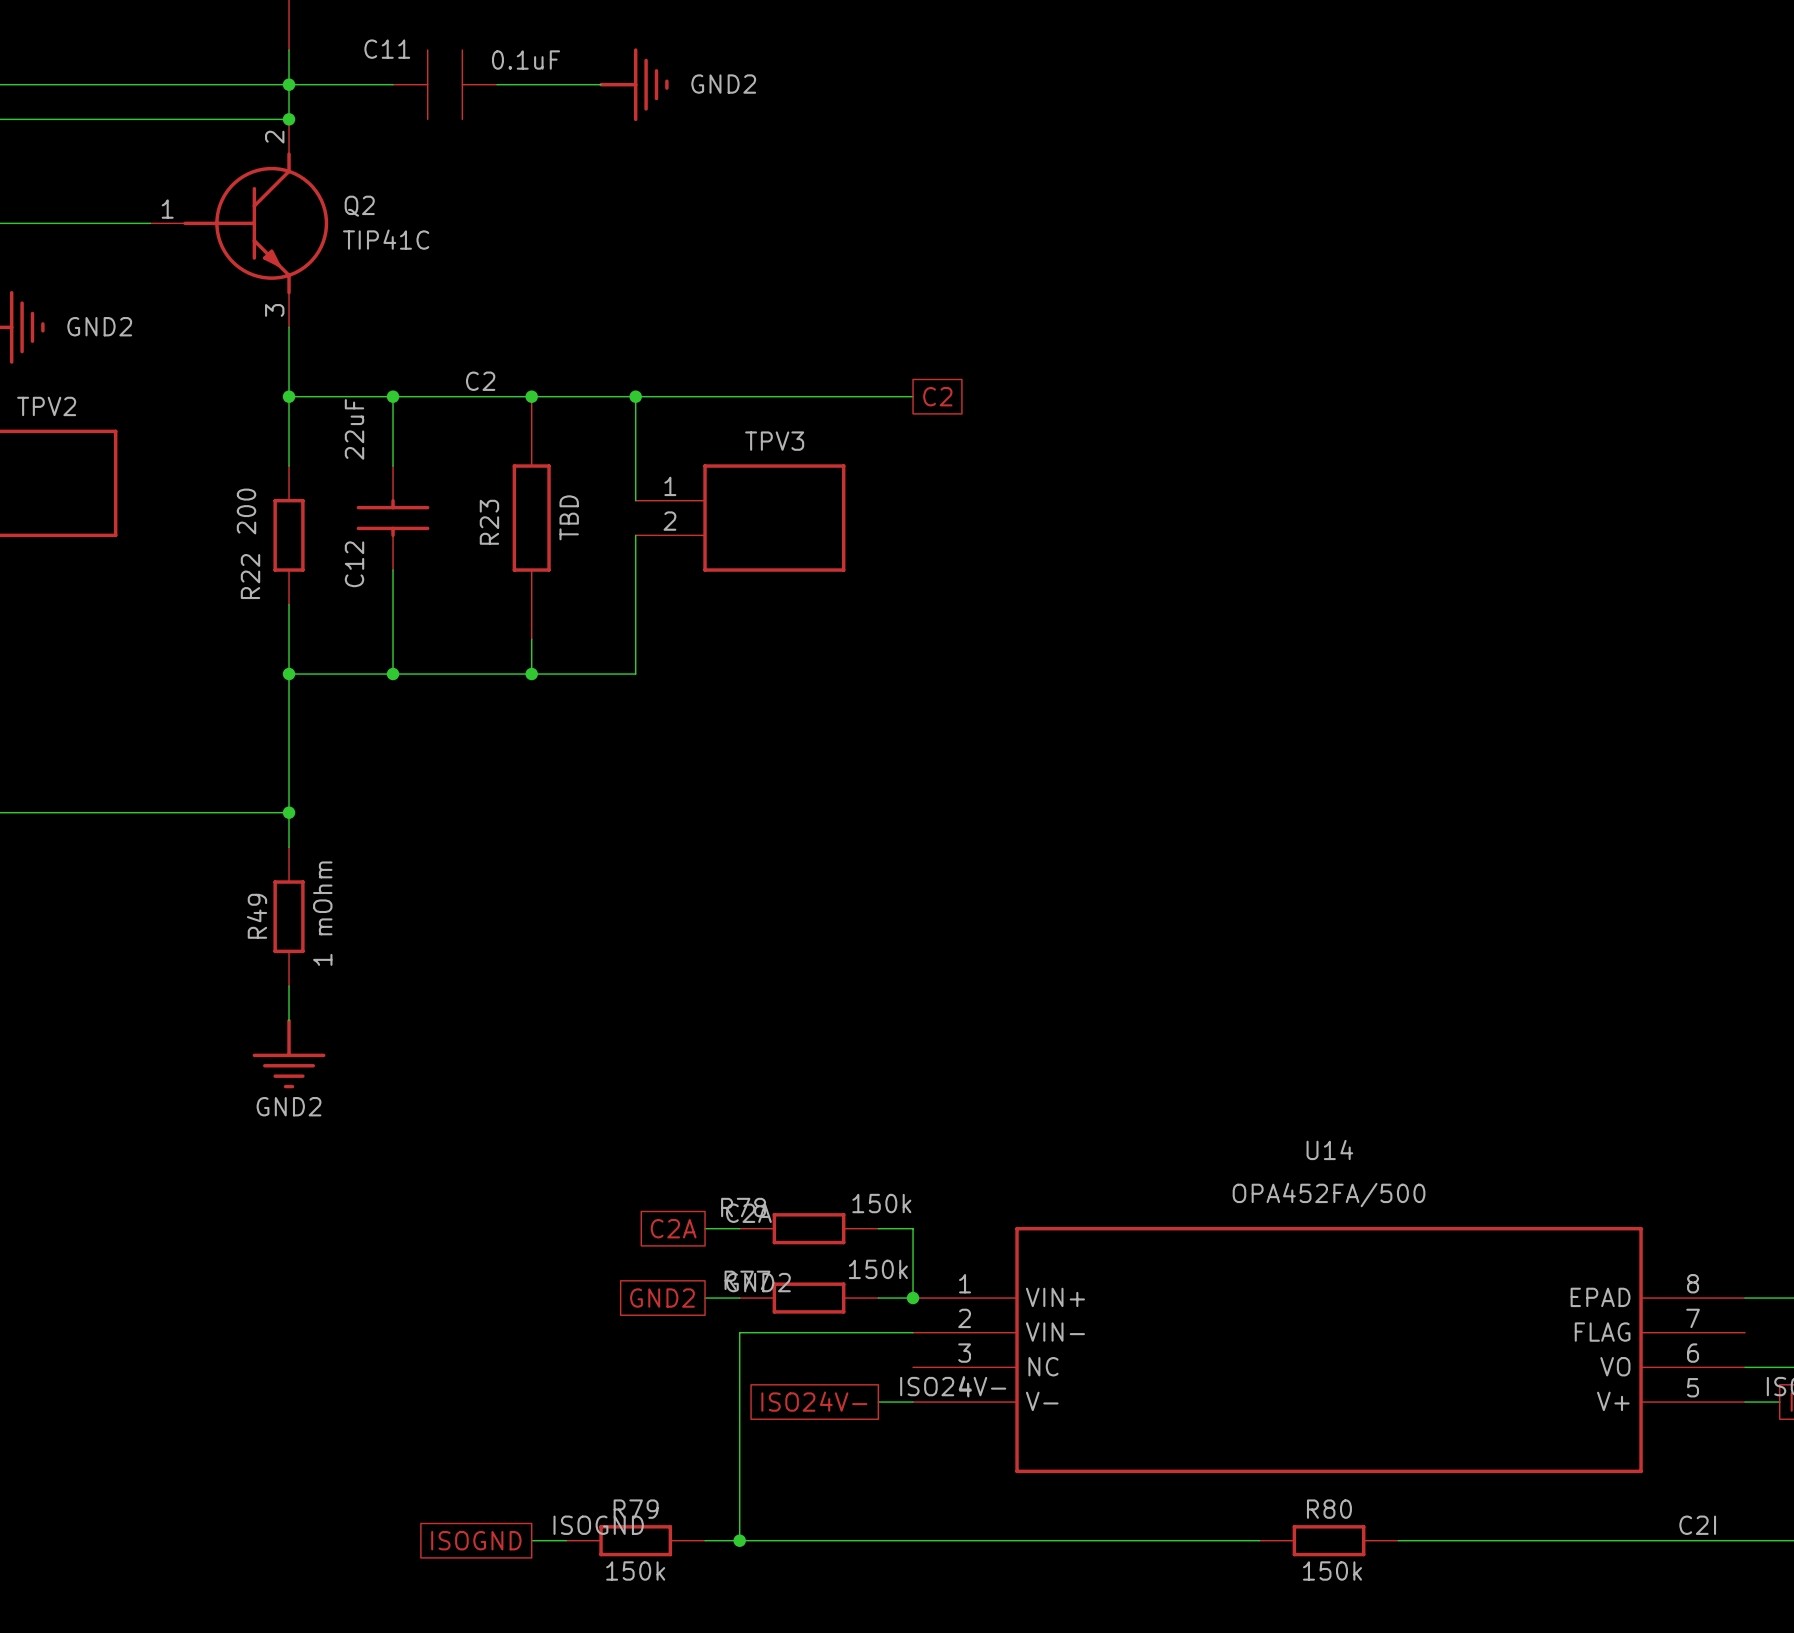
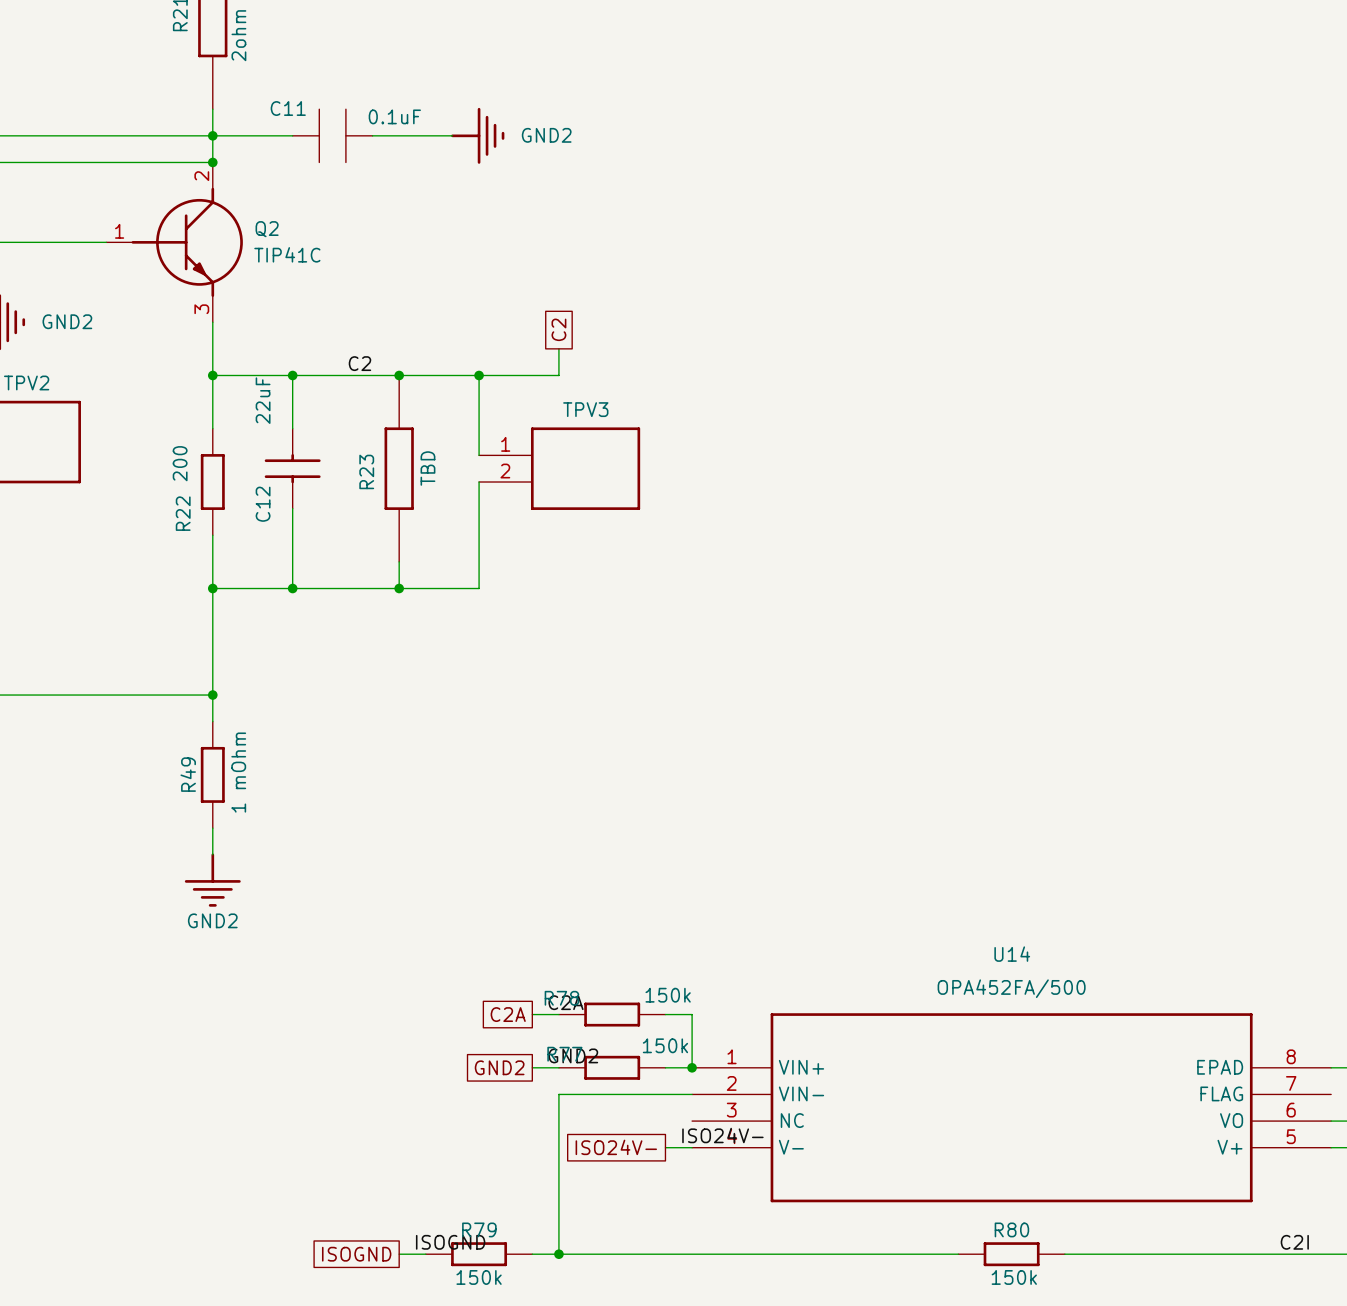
wire: (739, 396) (913, 396) -> (558, 375) (558, 348)
global label rotation: 0° (937, 396) -> 90° counterclockwise (558, 329)
global label position: C2 (937, 396) -> C2 (558, 329)

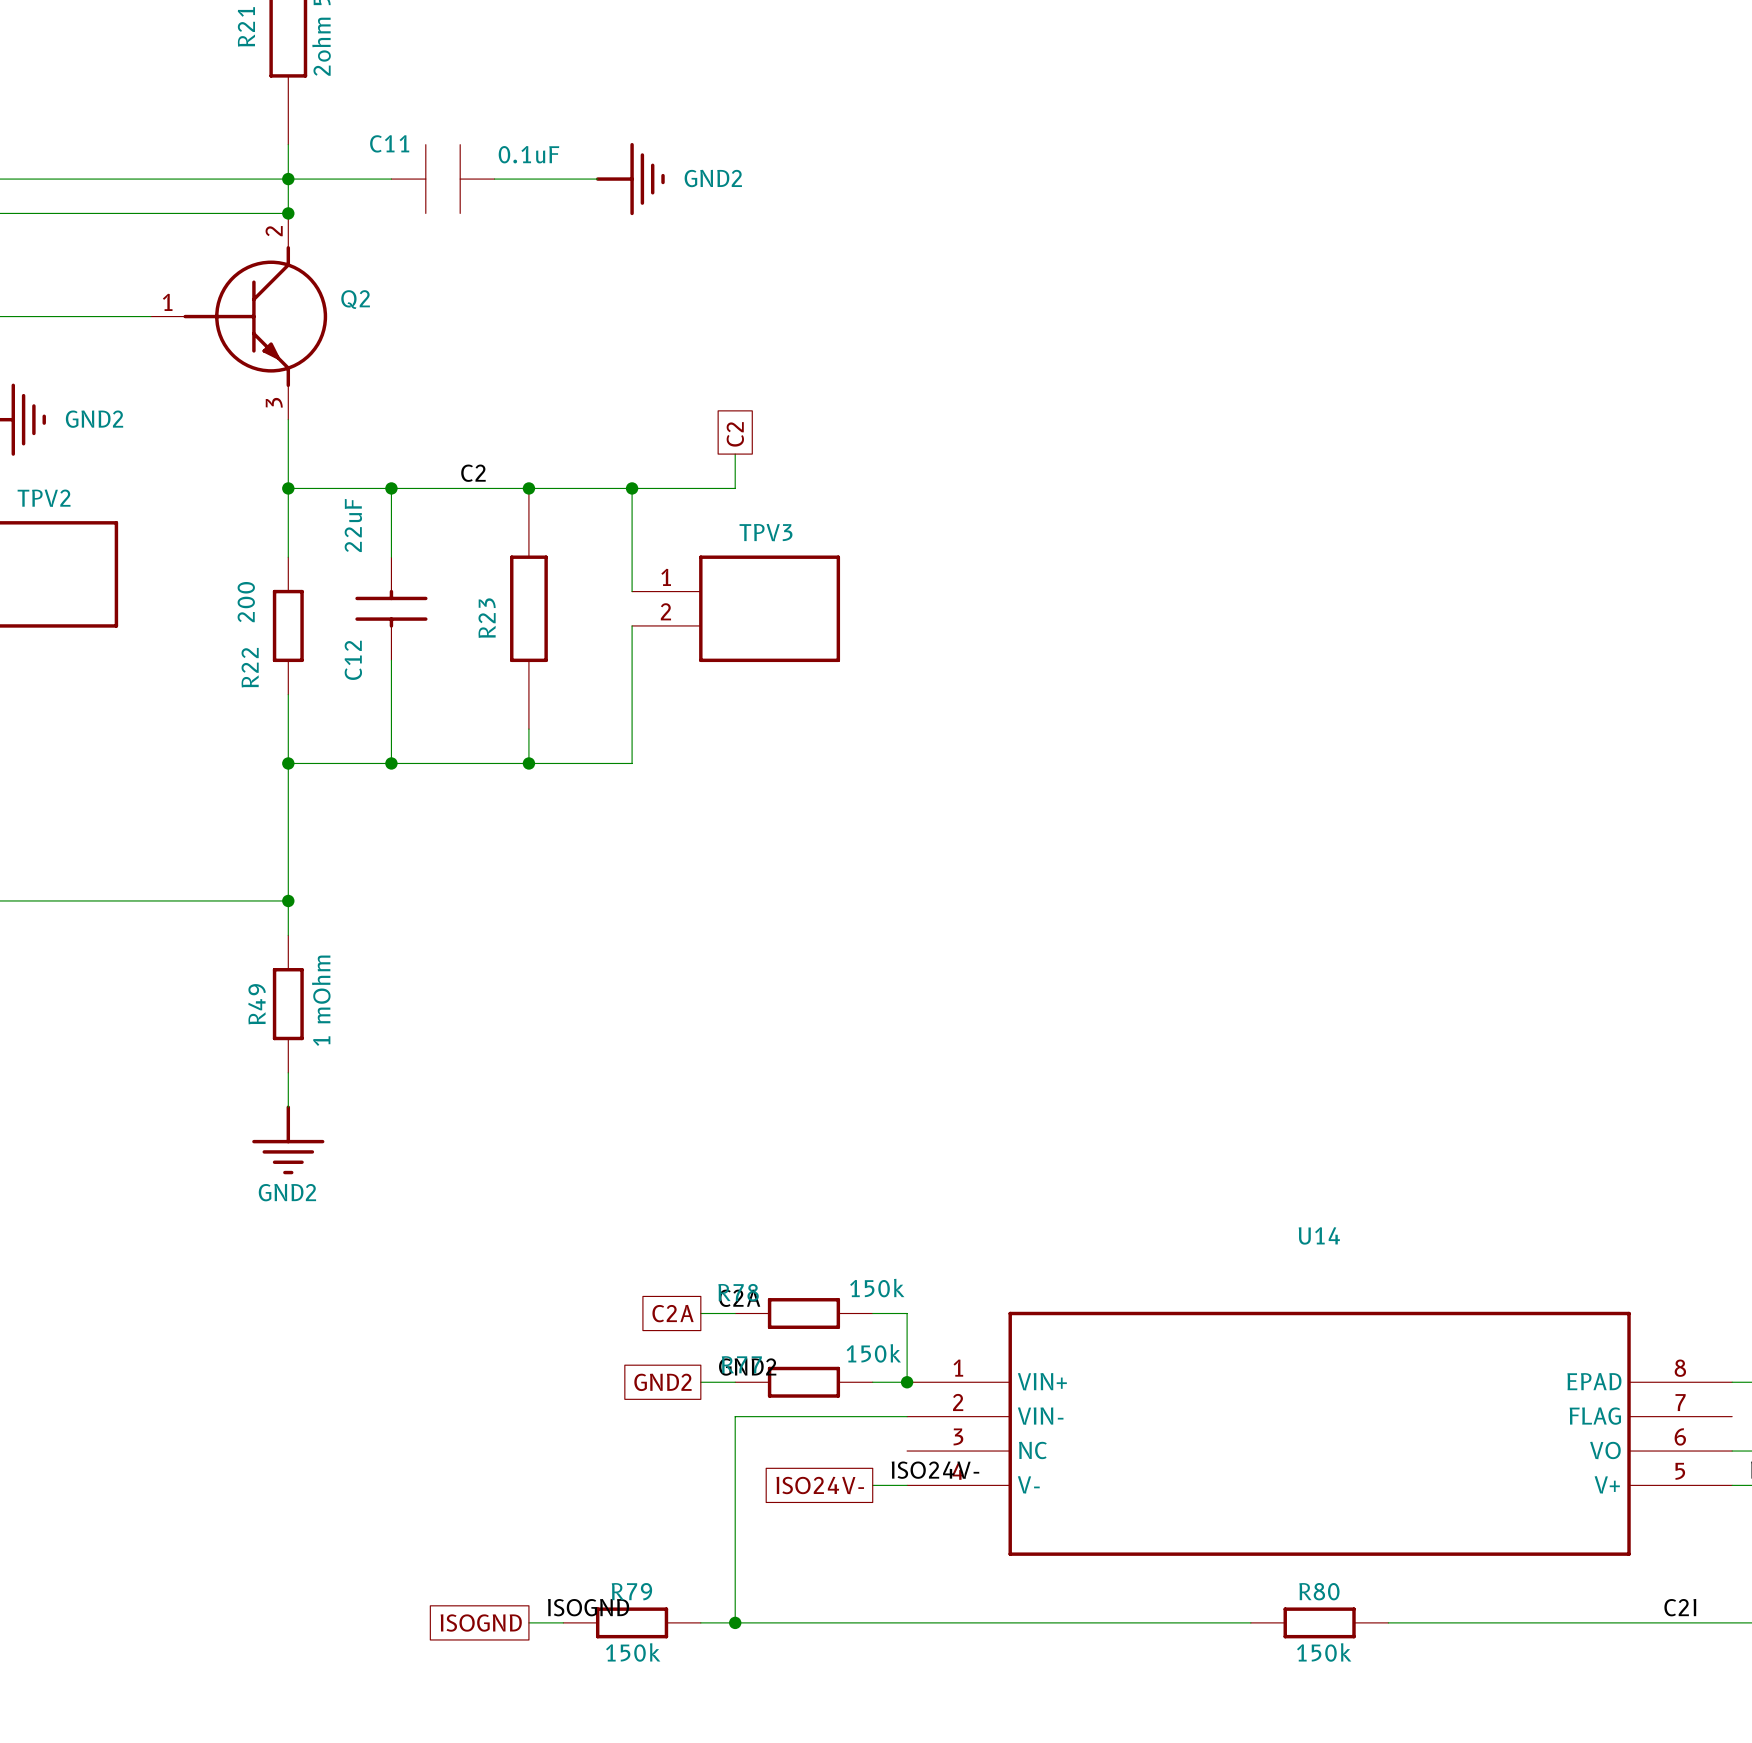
Q2 value: TIP41C (287, 254) -> none
R23 value: TBD (427, 468) -> none
U14 value: OPA452FA/500 (1011, 988) -> none

